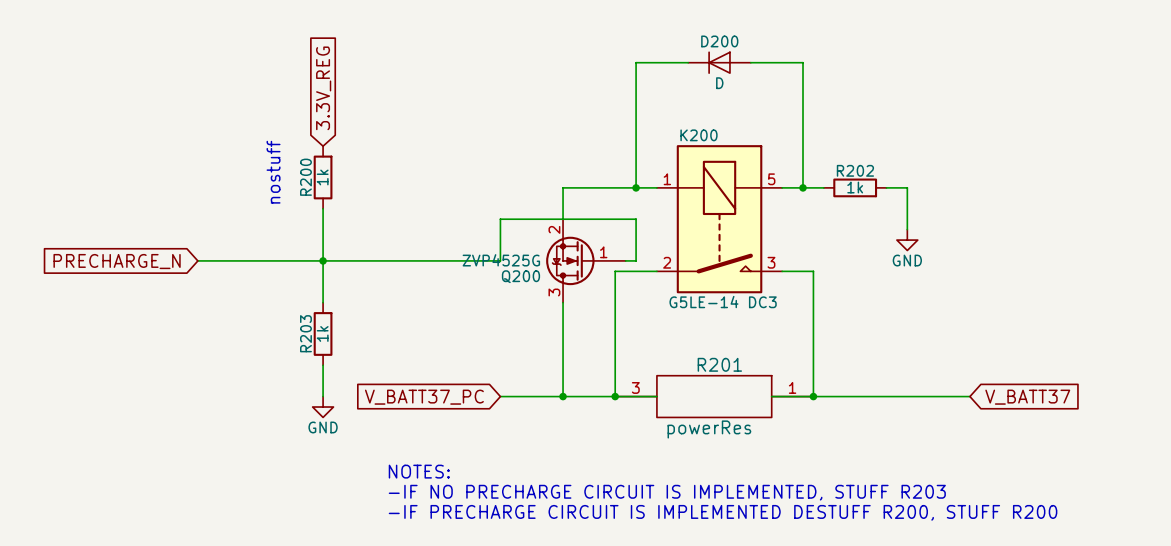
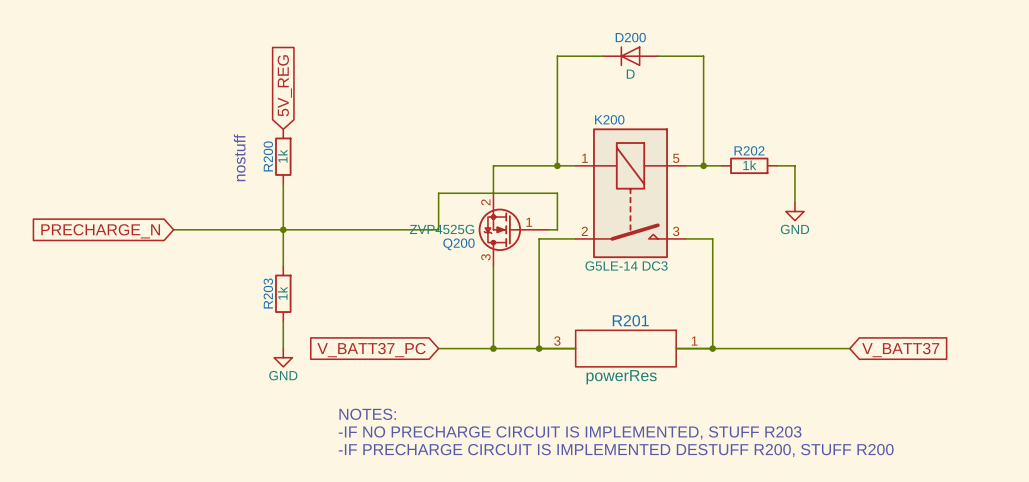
global label: 3.3V_REG (323, 88) -> 5V_REG (284, 85)

